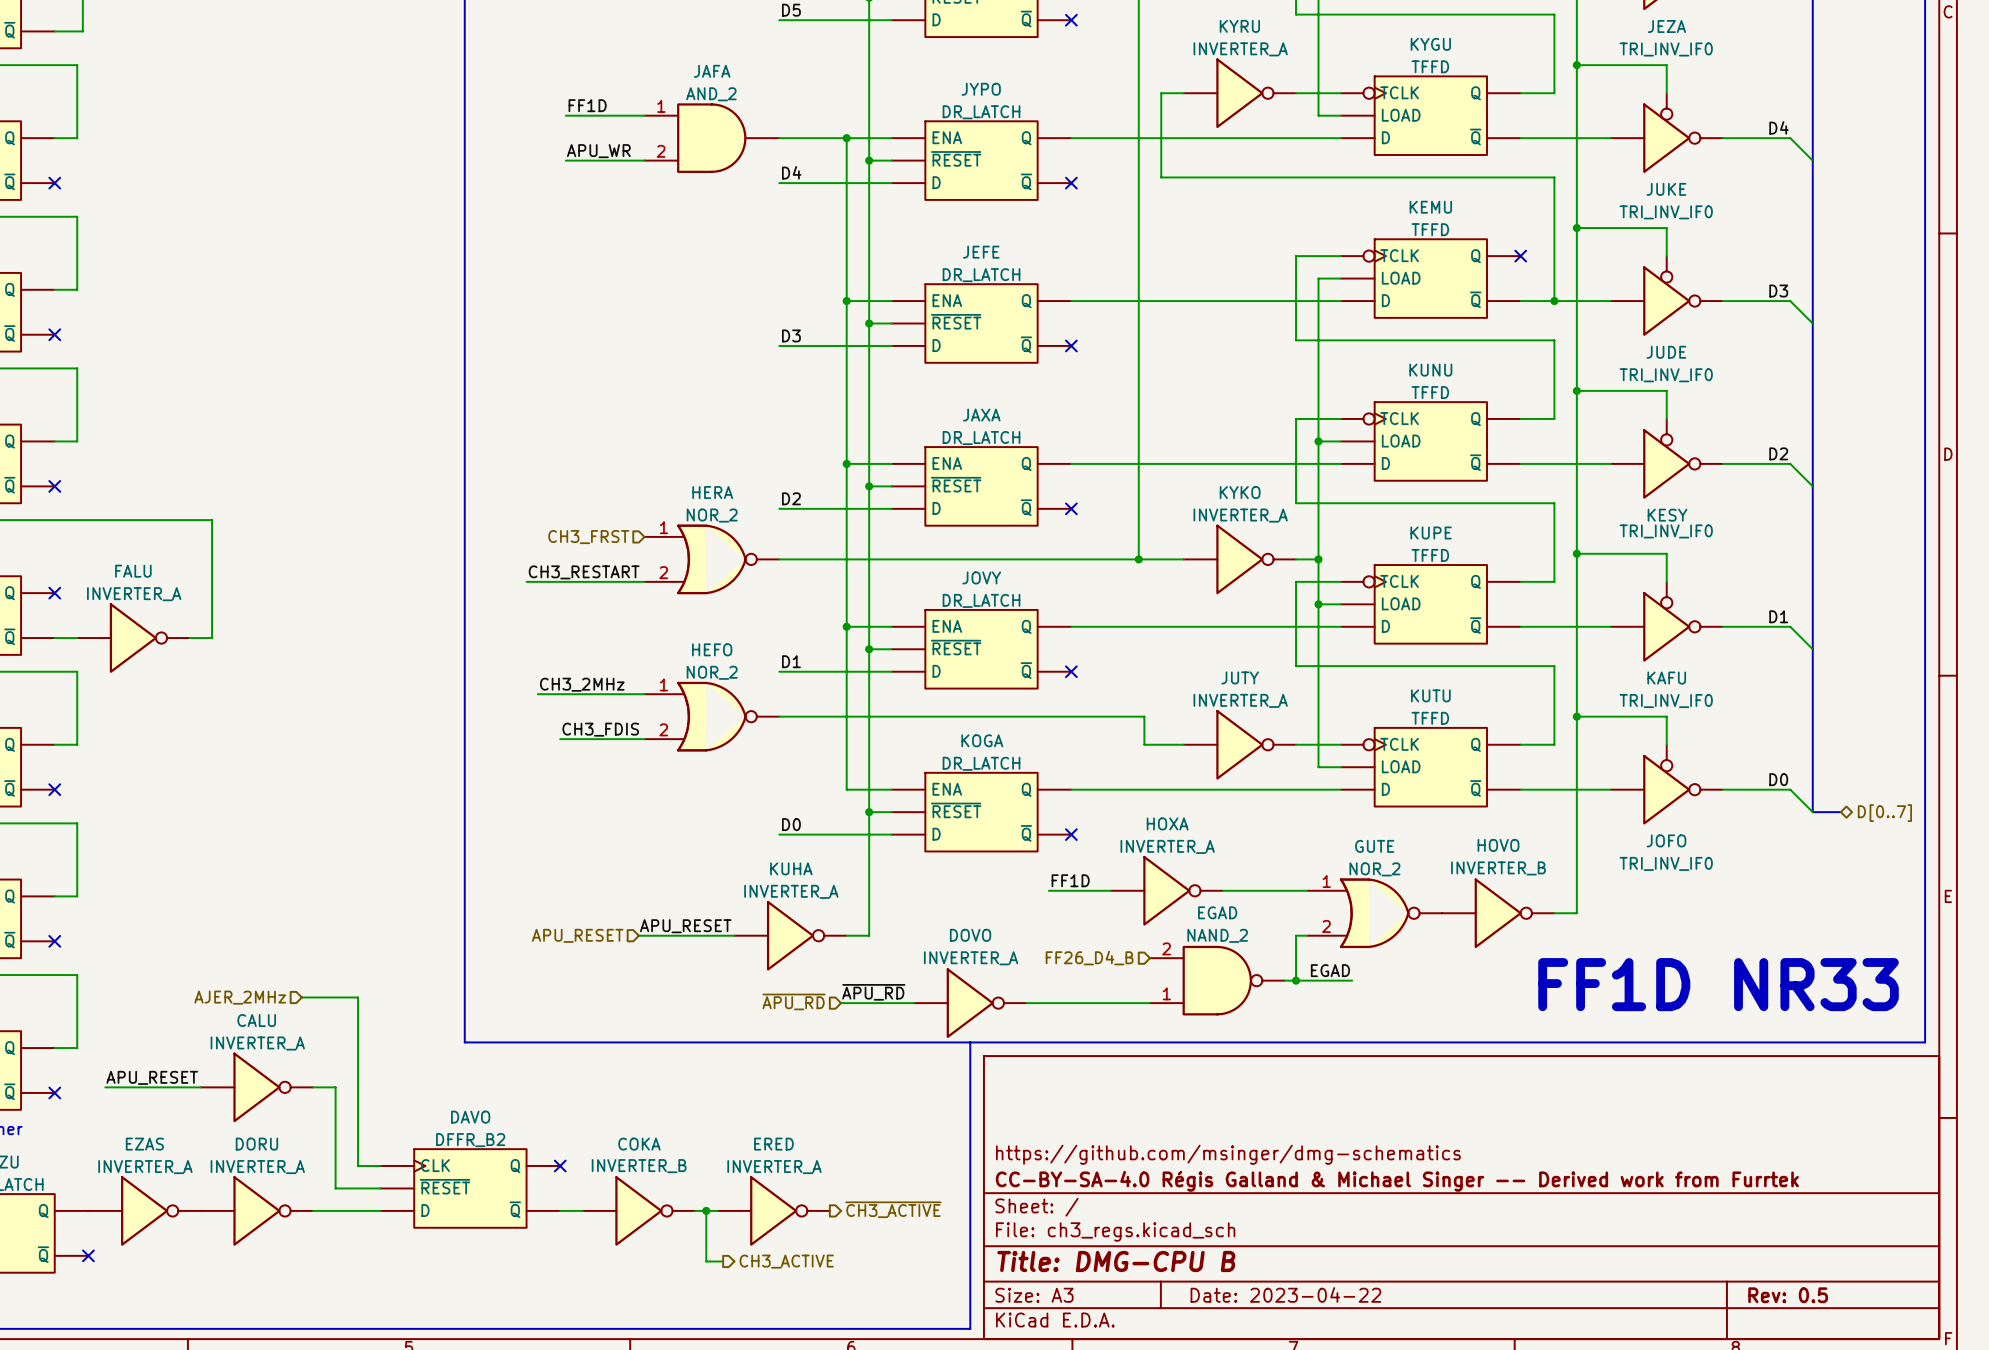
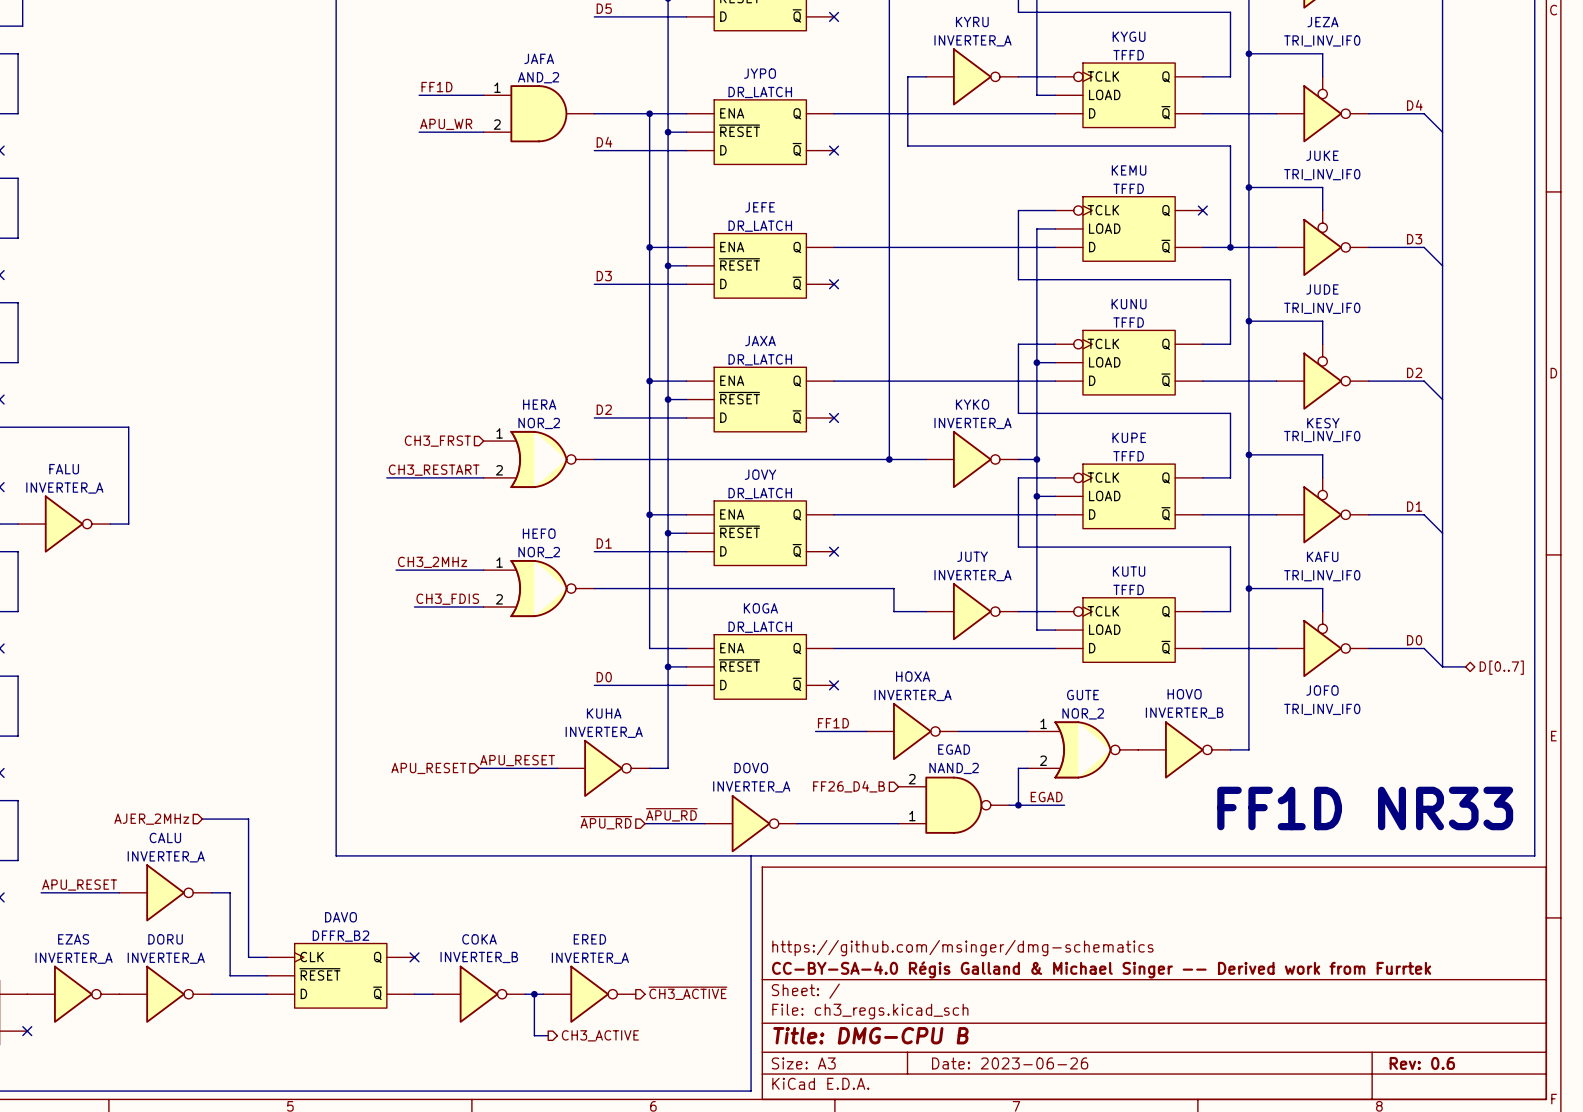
title block: Date: 2023-04-22 (1285, 1294) -> Date: 2023-06-26 (1010, 1063)
title block: Rev: 0.5 (1788, 1295) -> Rev: 0.6 (1422, 1063)

